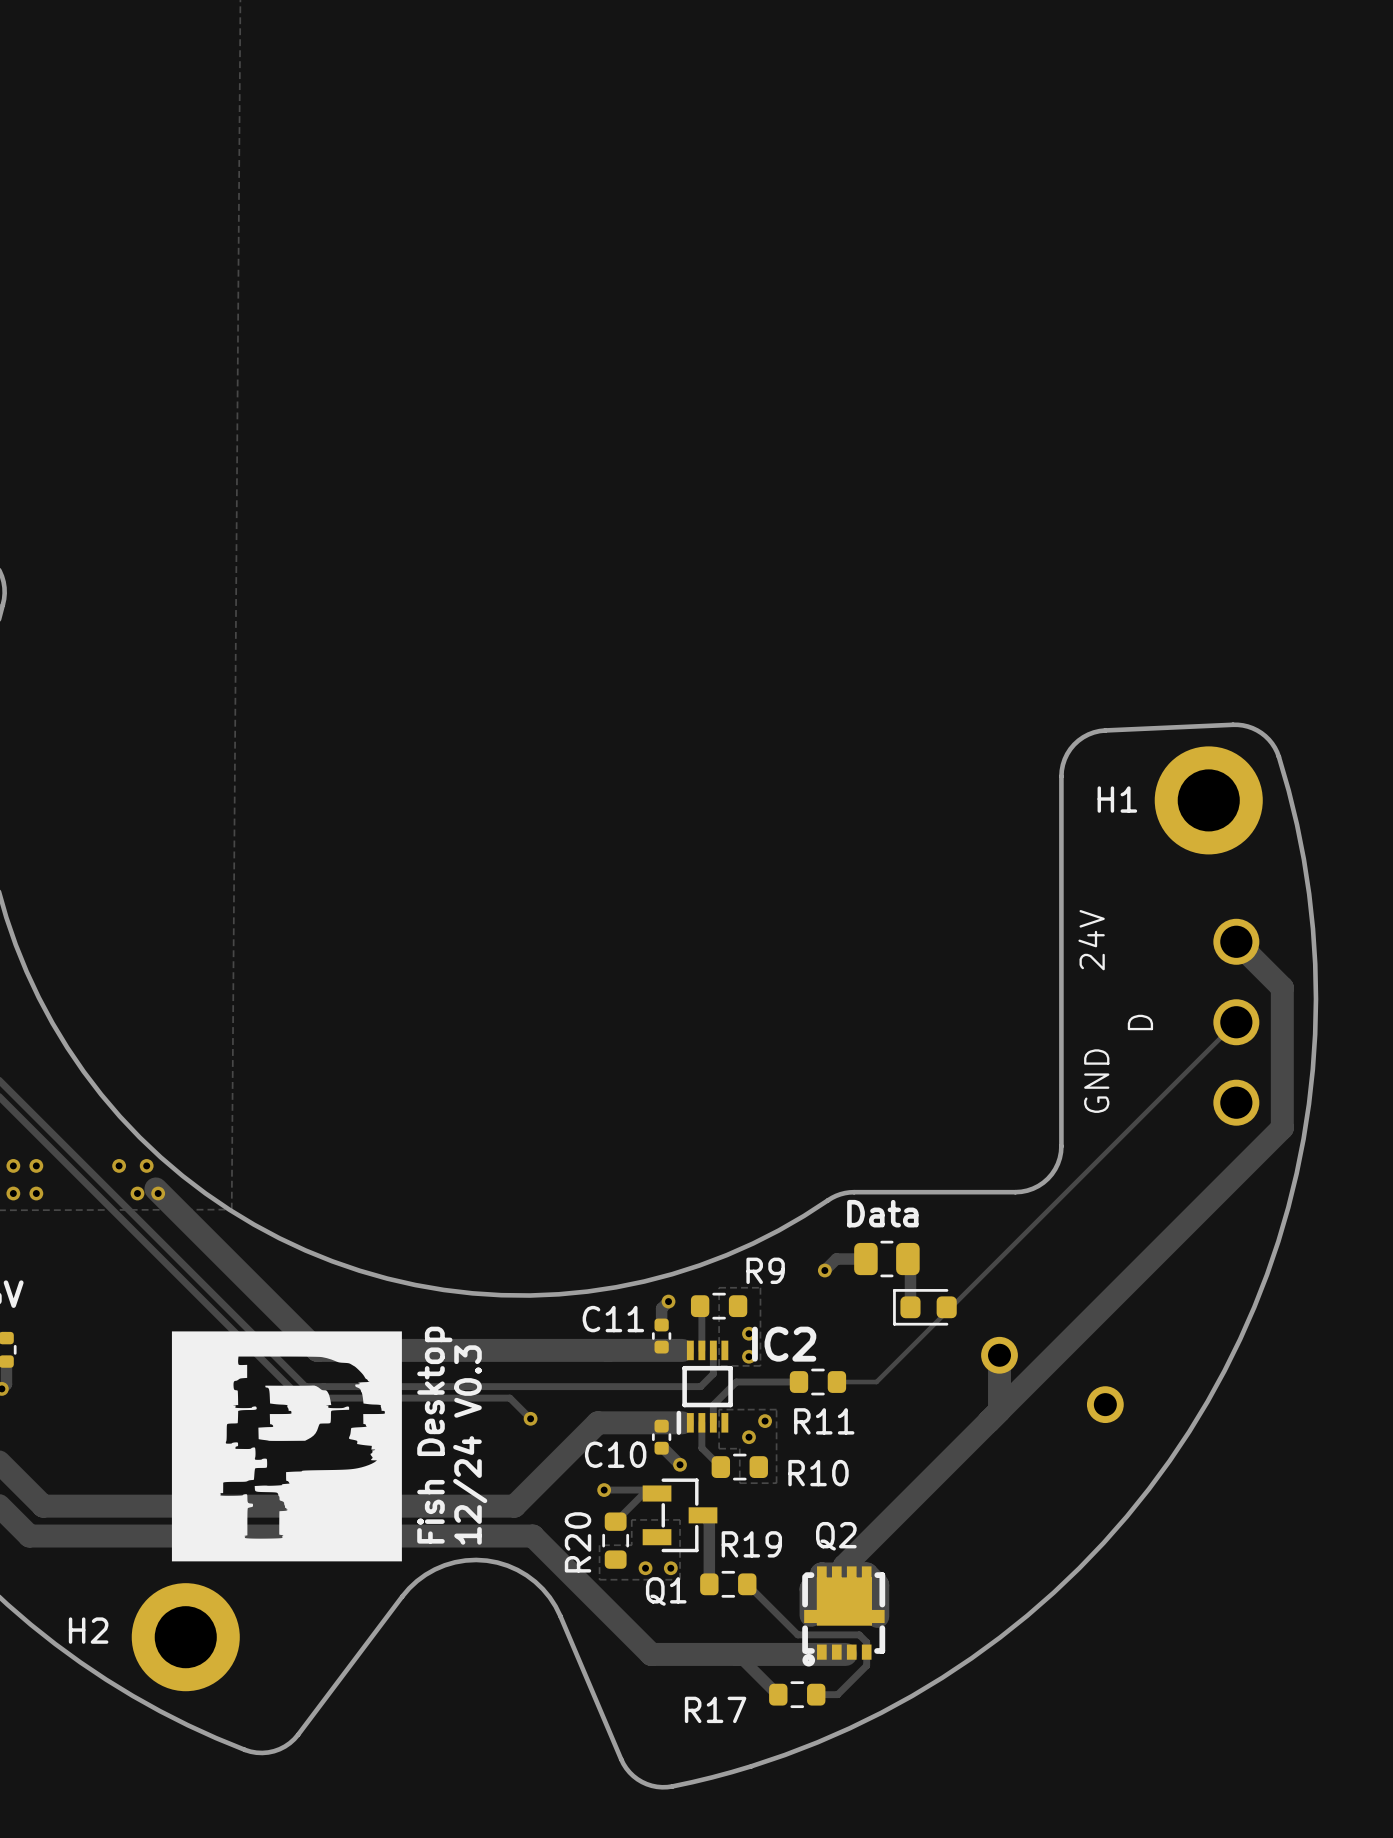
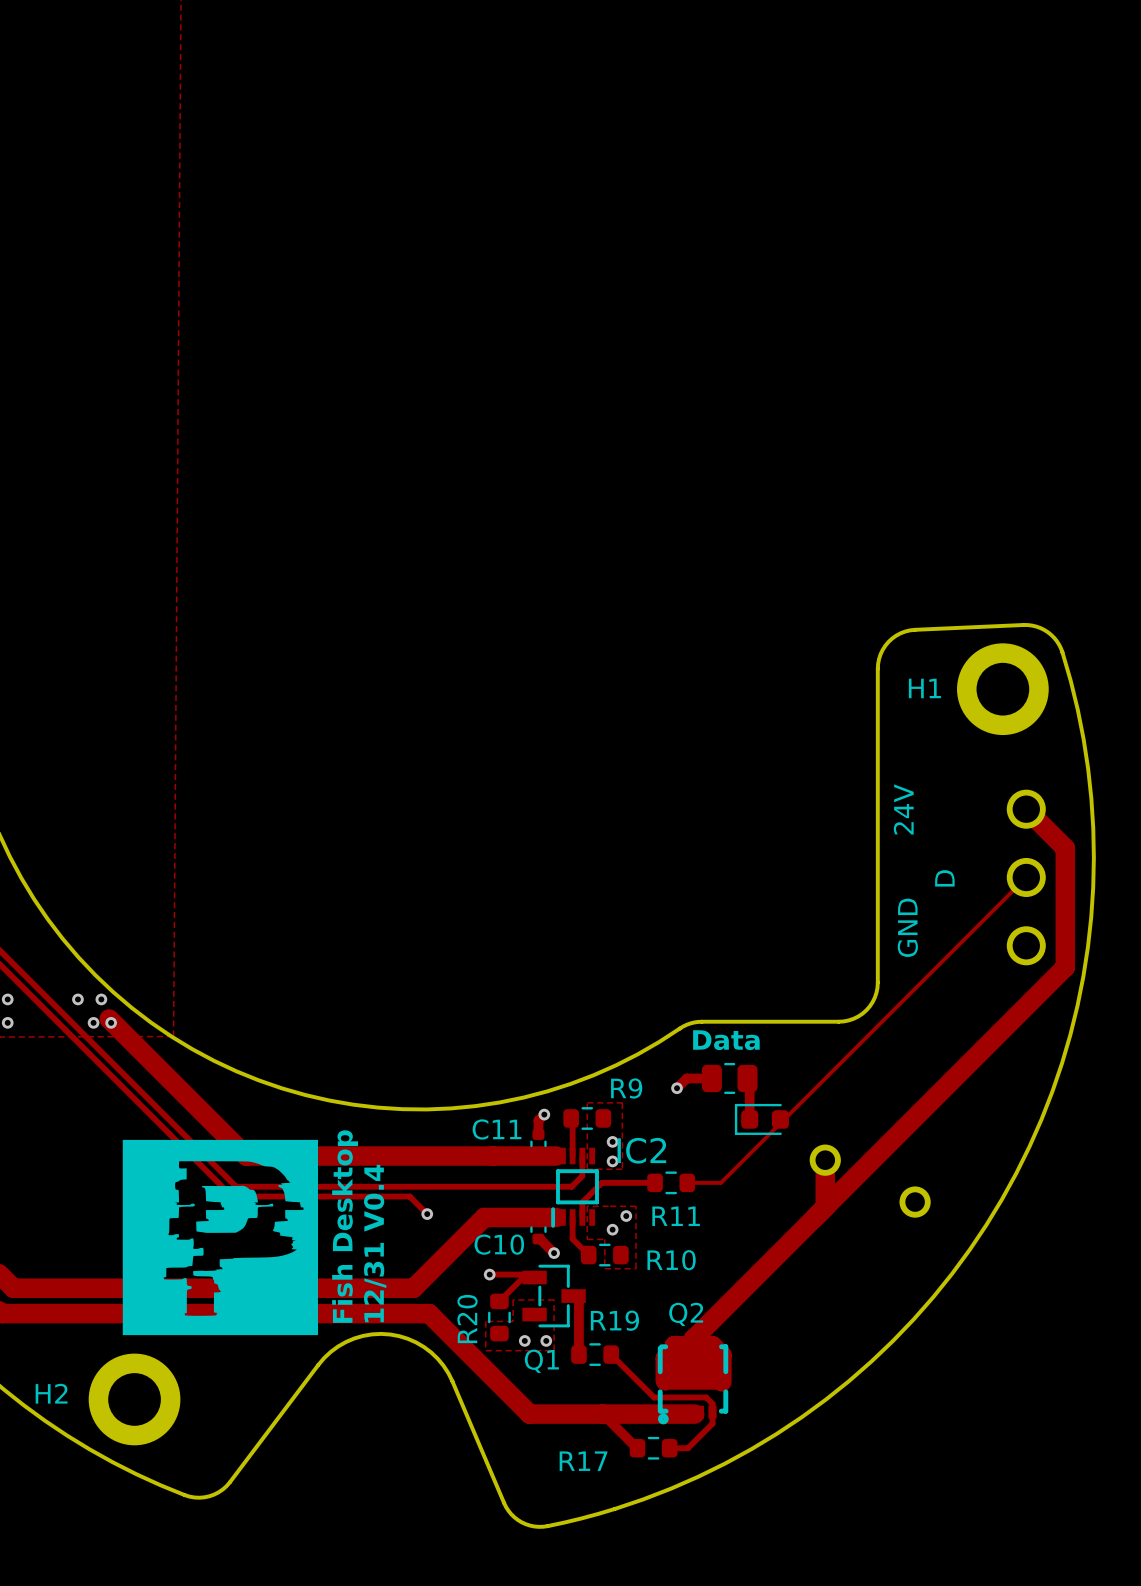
text: 12/24 V0.3 (470, 1445) -> 12/31 V0.4 (375, 1243)

